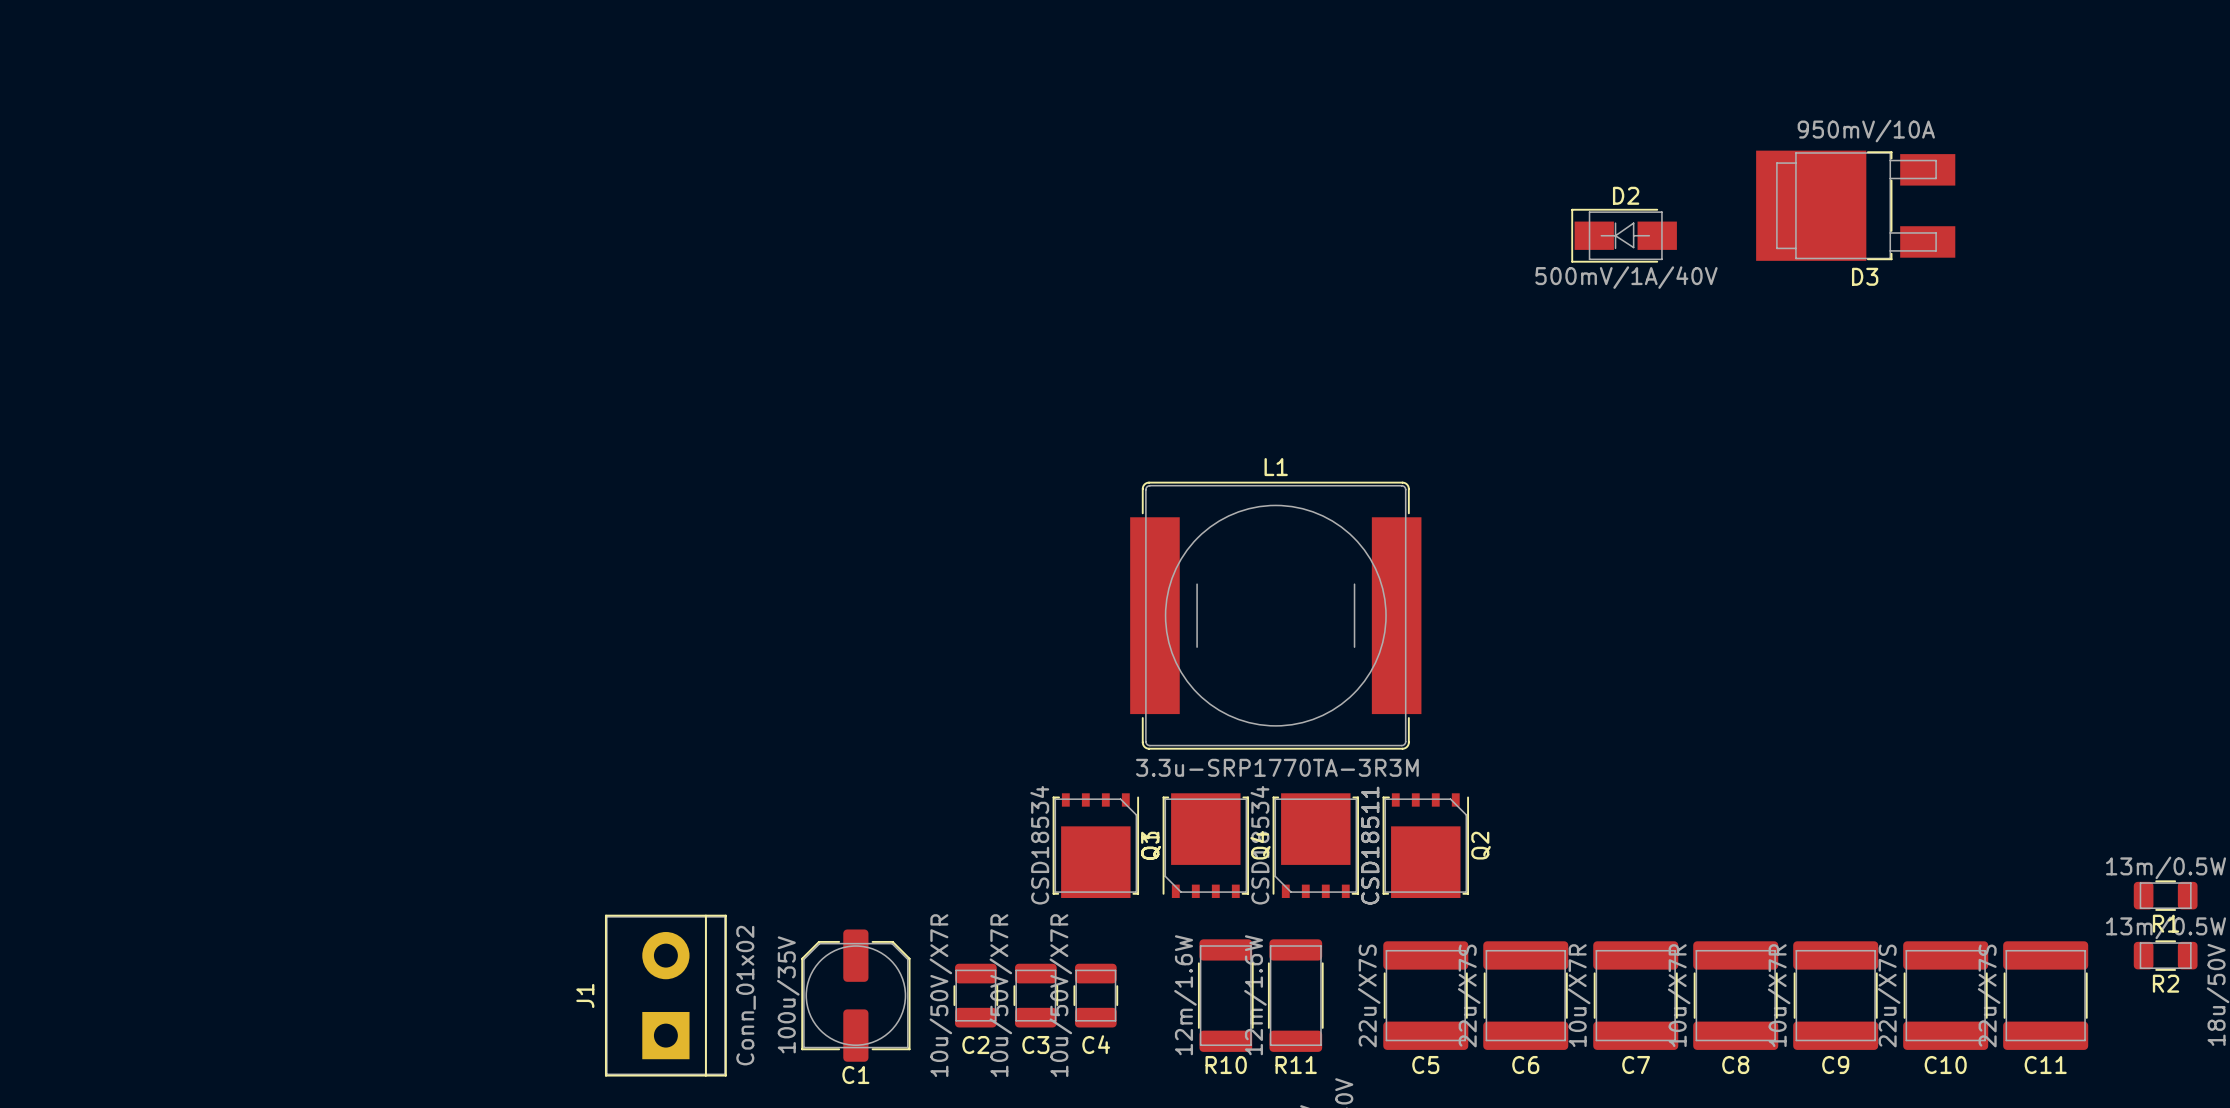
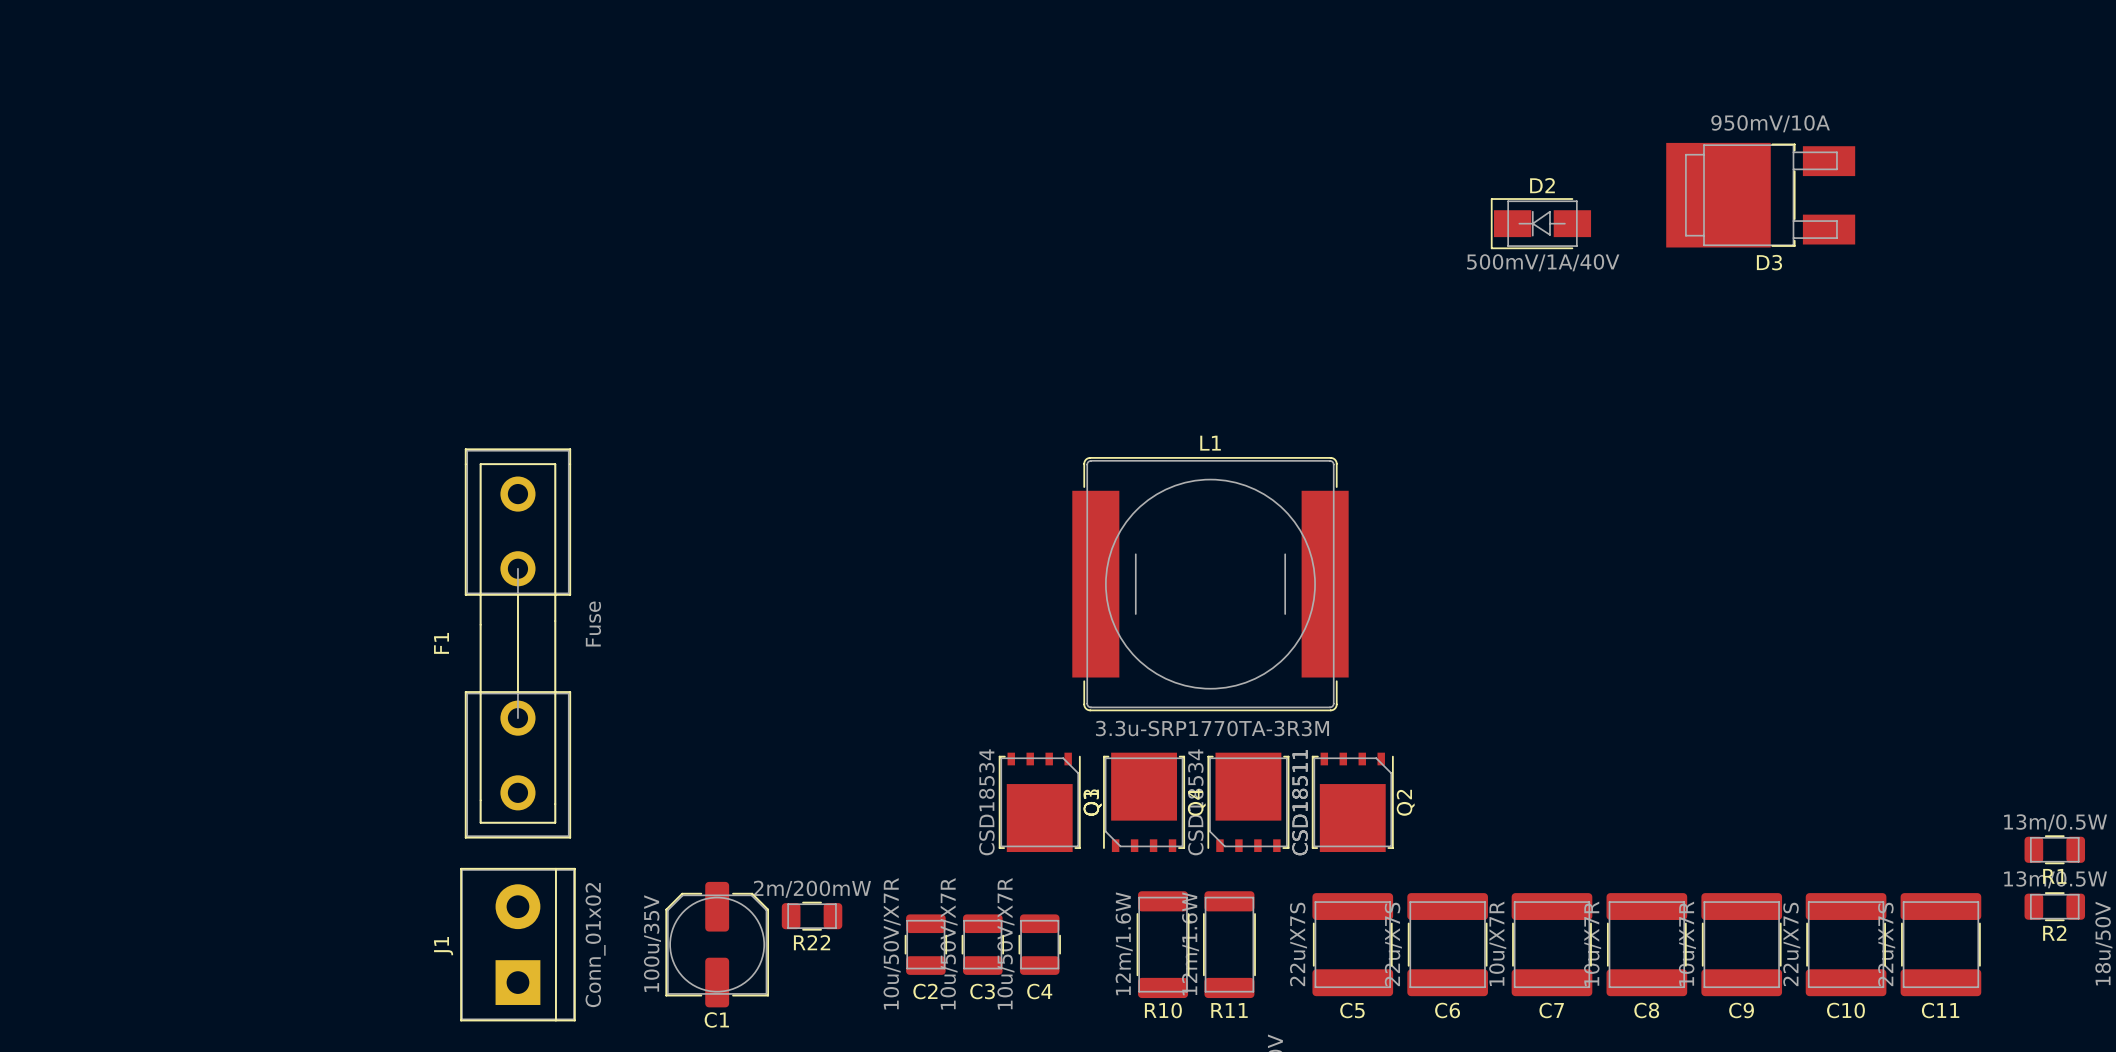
F1: none -> Fuse (517, 643)
R22: none -> 2m/200mW (812, 916)
J1 position: (665, 995) -> (517, 944)
C1 position: (855, 995) -> (717, 944)

